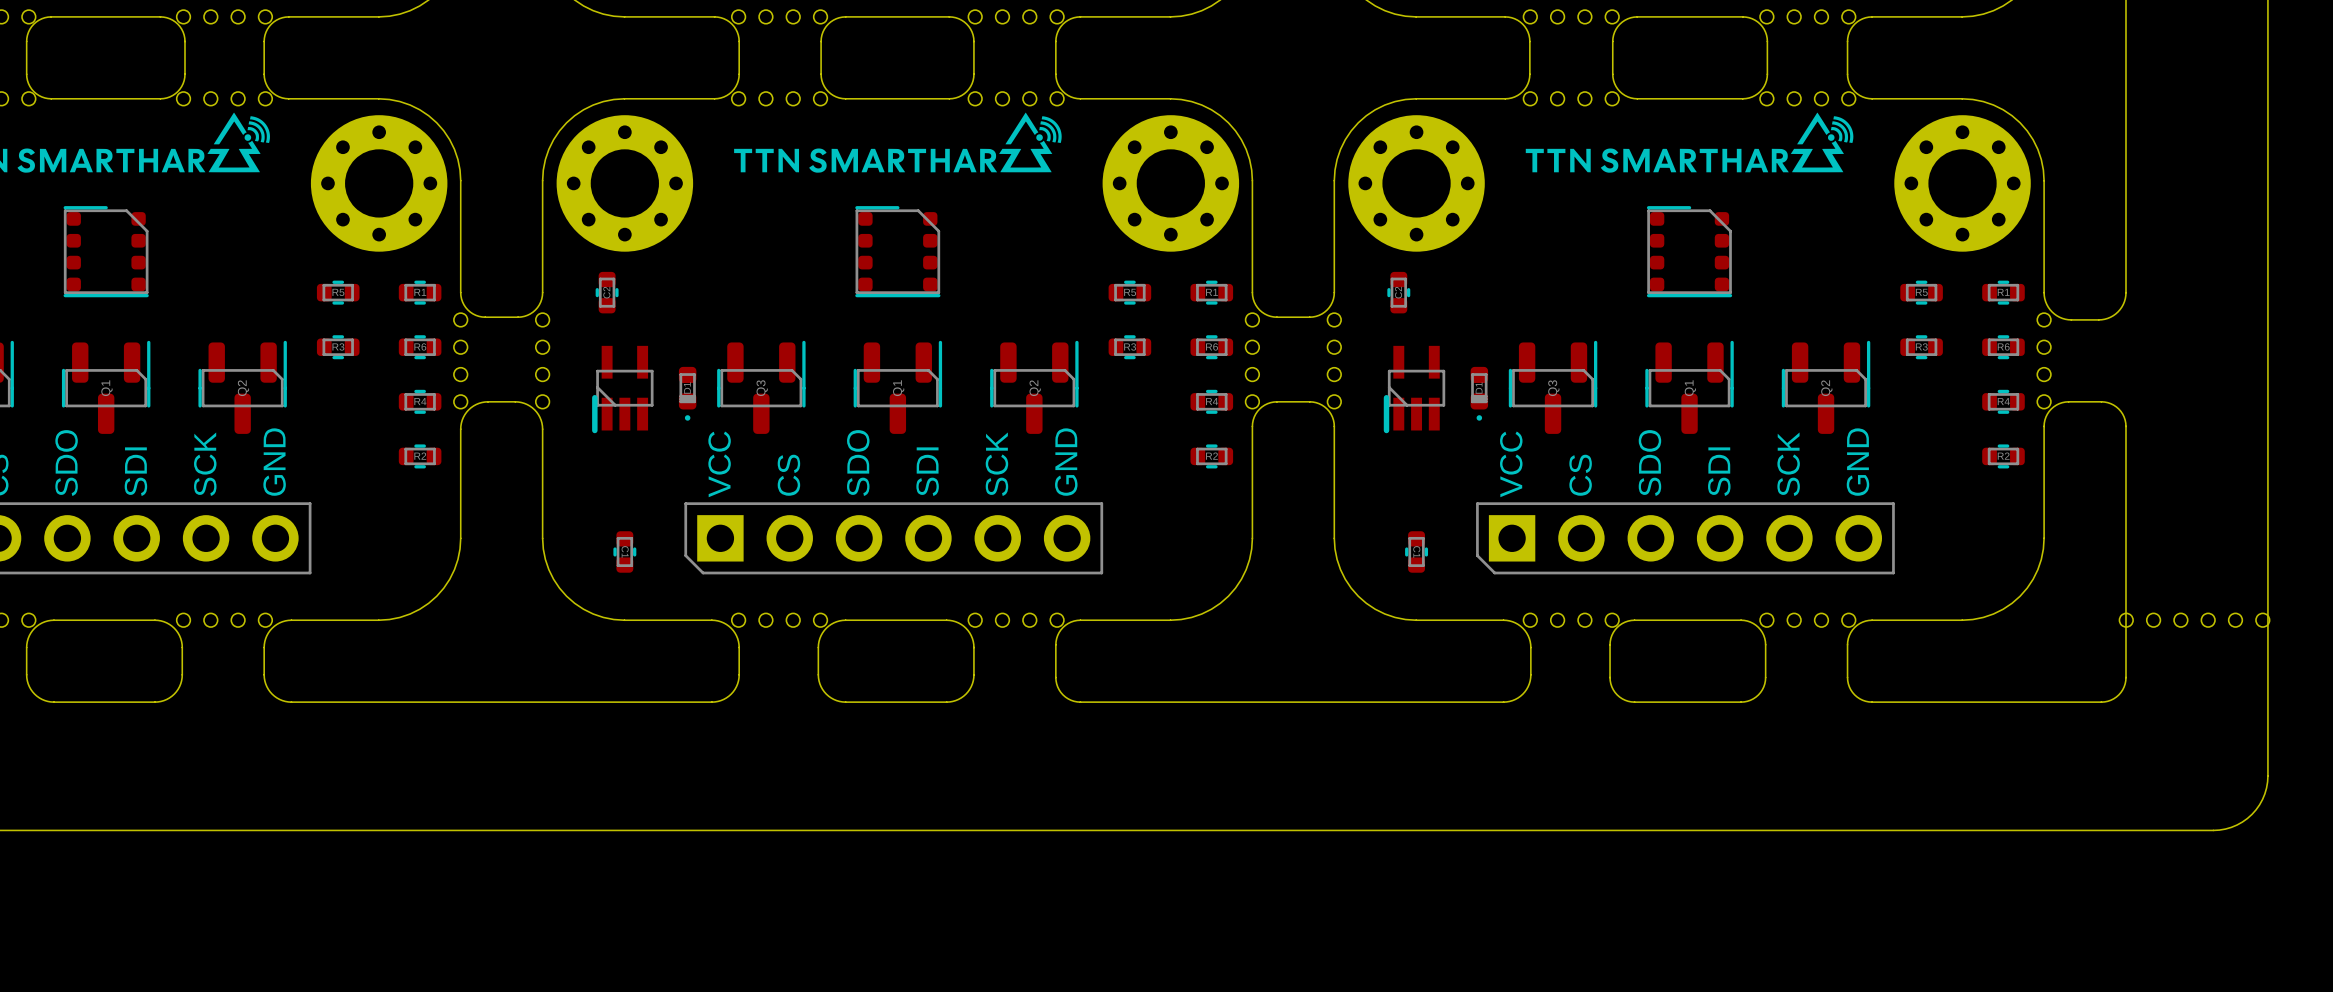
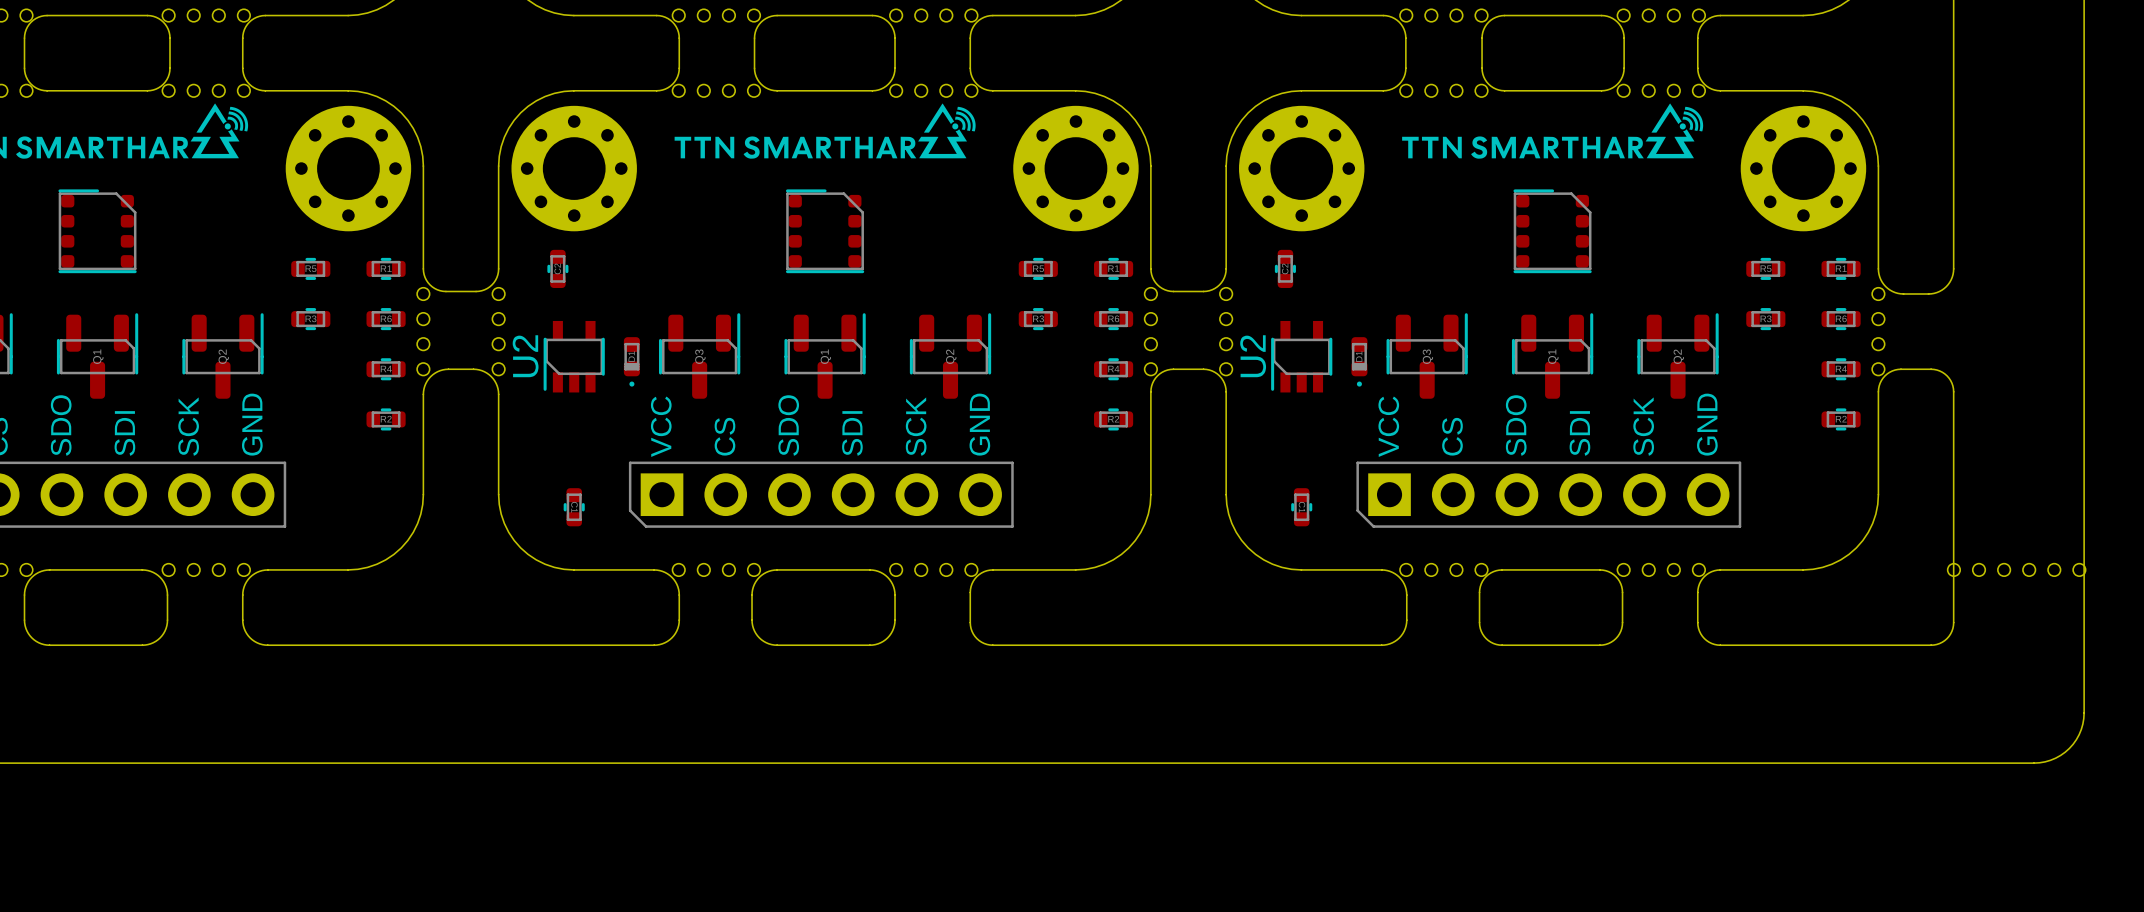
U2: none -> (574, 356)
U2: none -> (1301, 356)
part: (622, 389) -> none
part: (1414, 389) -> none

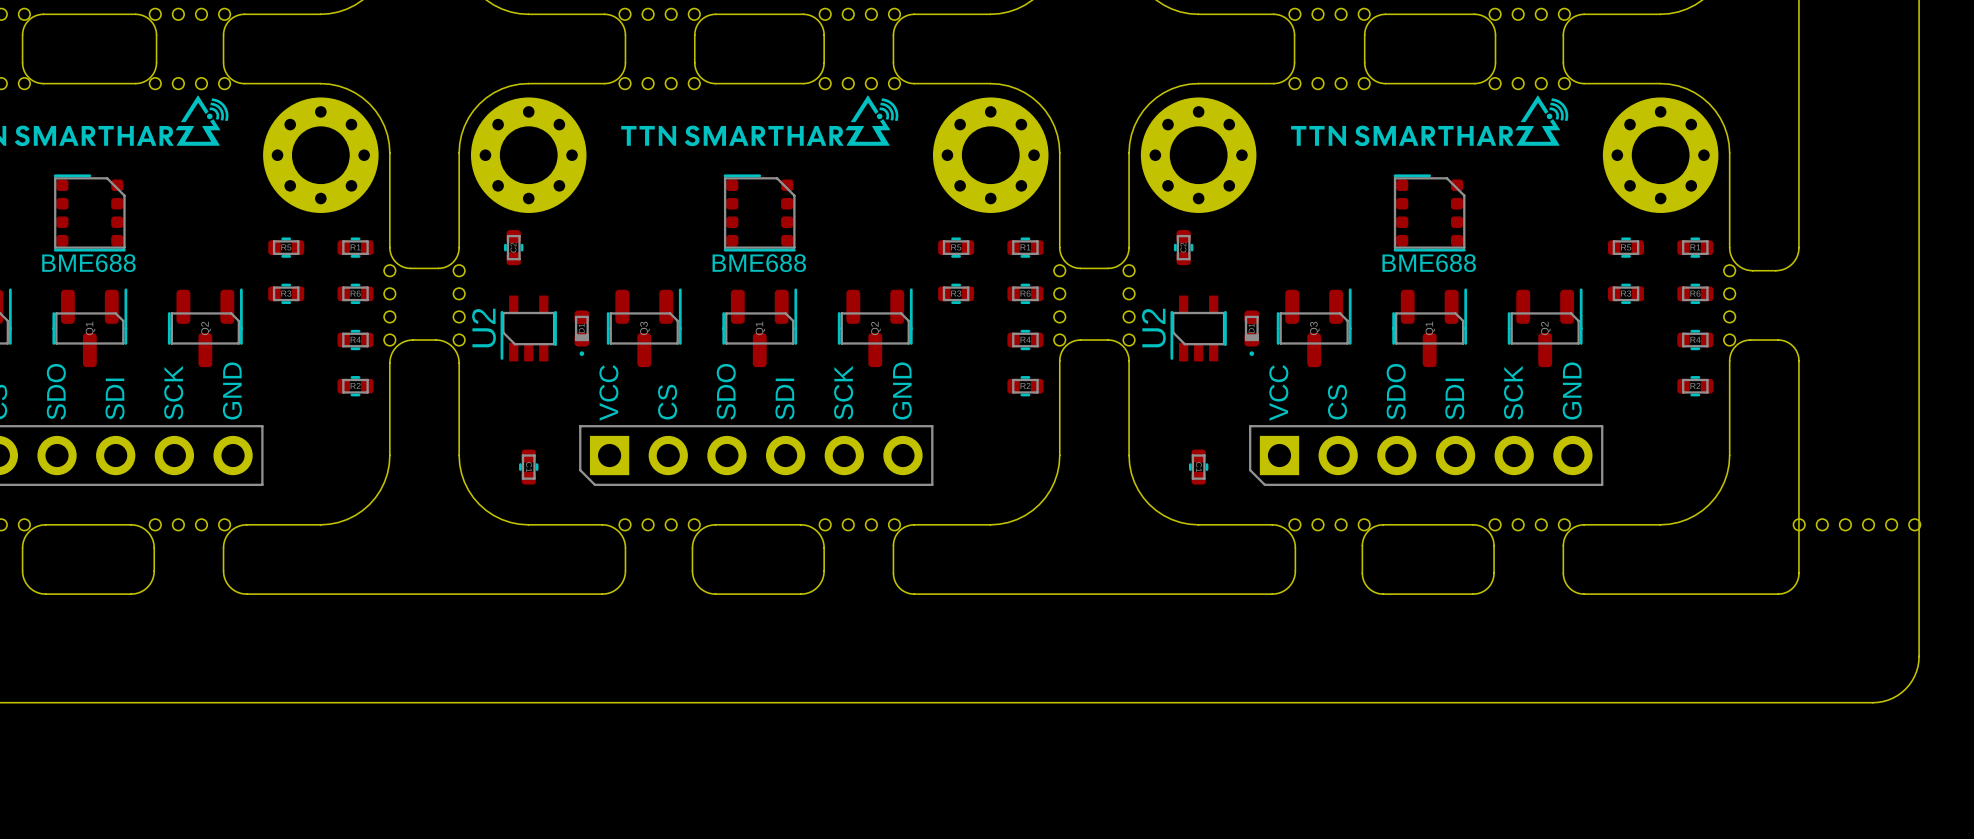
text: none -> BME688 (88, 263)
text: none -> BME688 (759, 263)
text: none -> BME688 (1429, 263)

